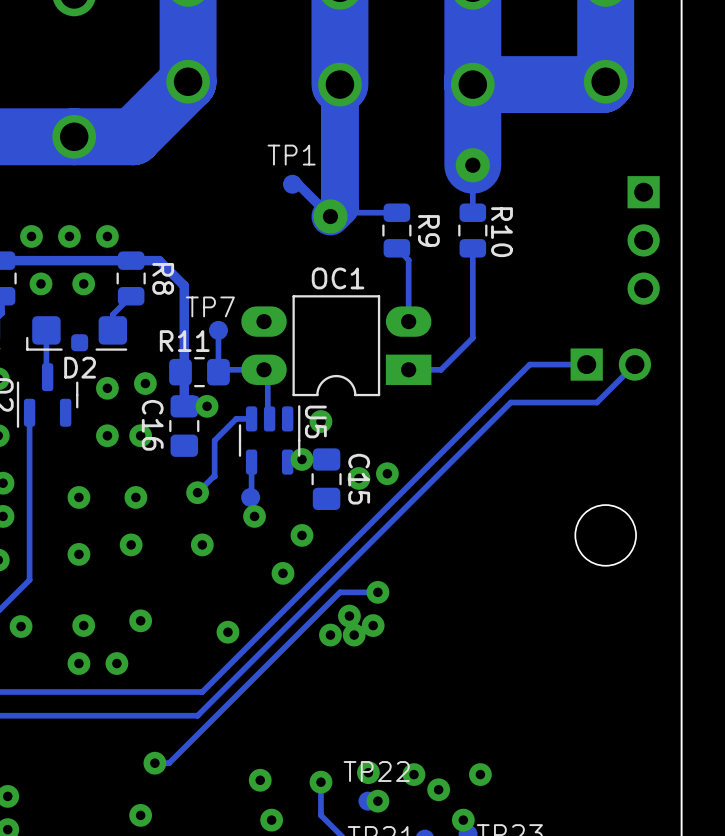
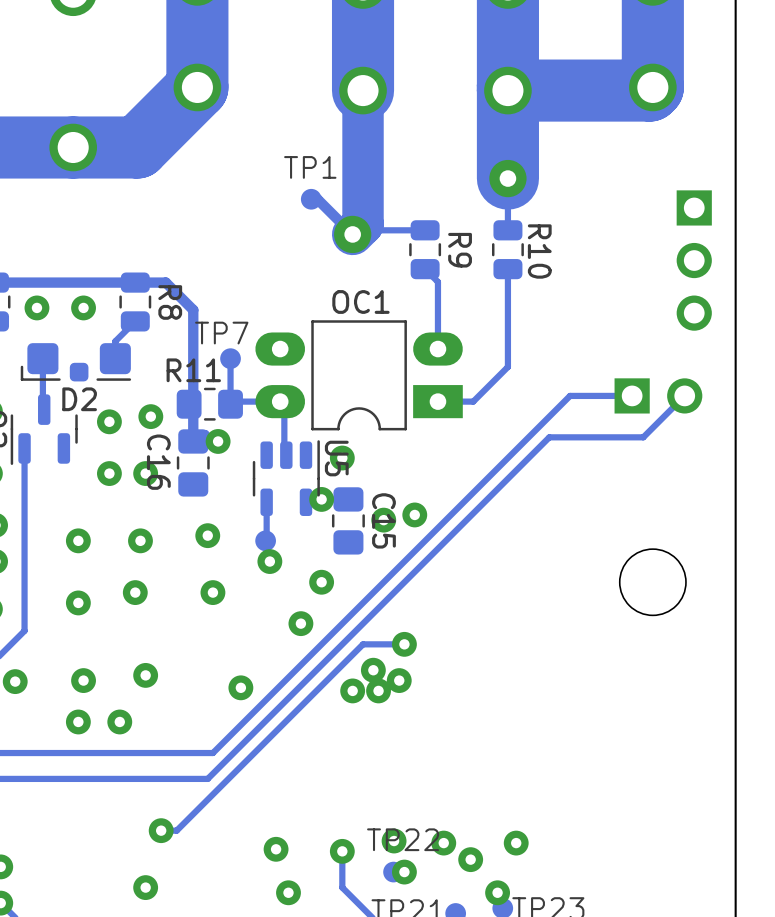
via: (31, 236) -> none
via: (69, 236) -> none
via: (107, 236) -> none
track: (251, 418) (236, 418) (214, 440) (214, 476) (197, 492) -> none

